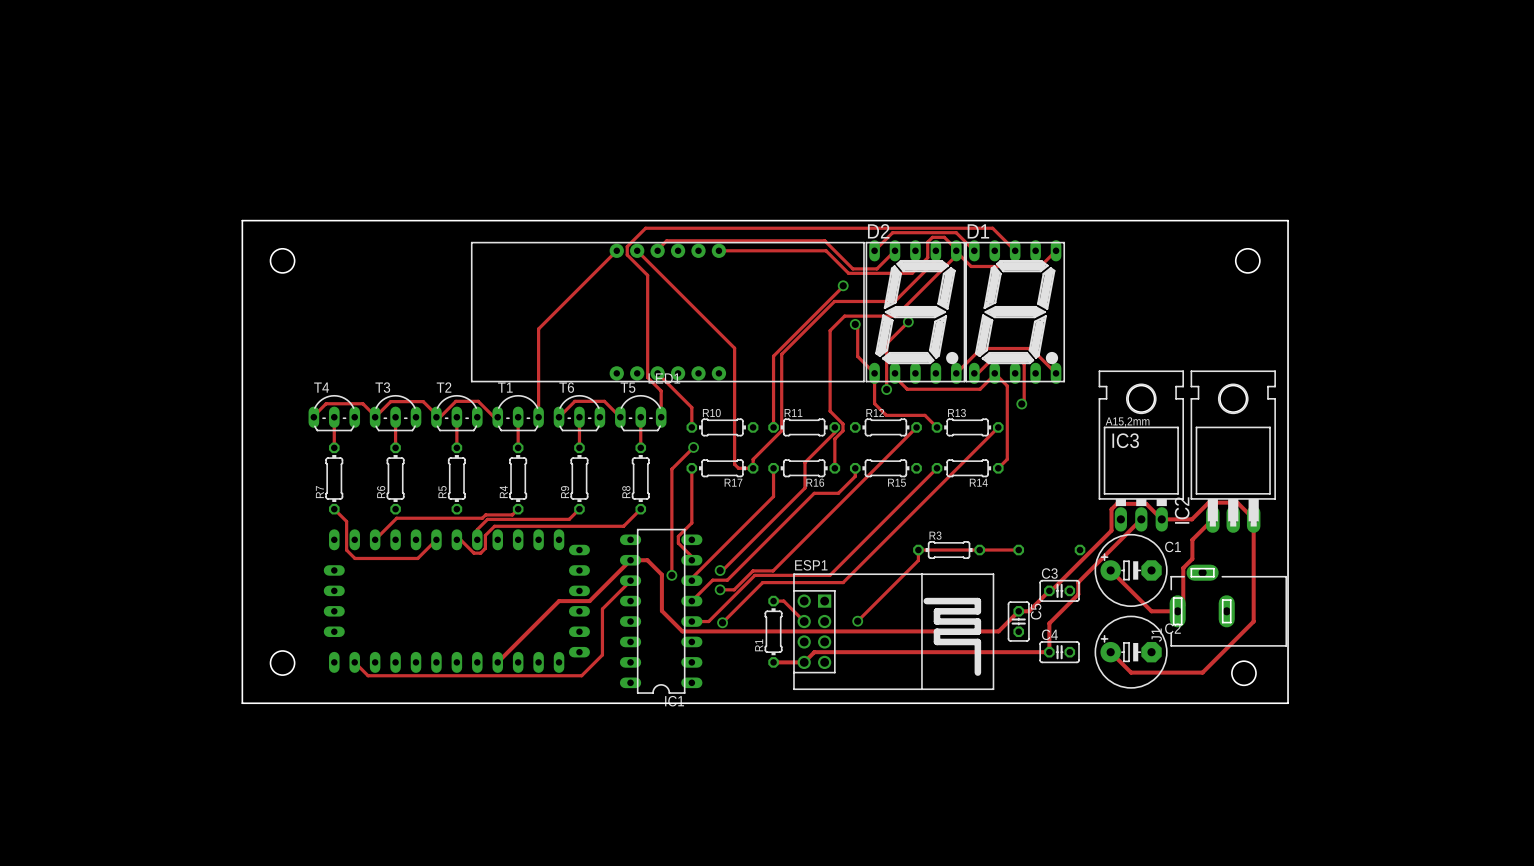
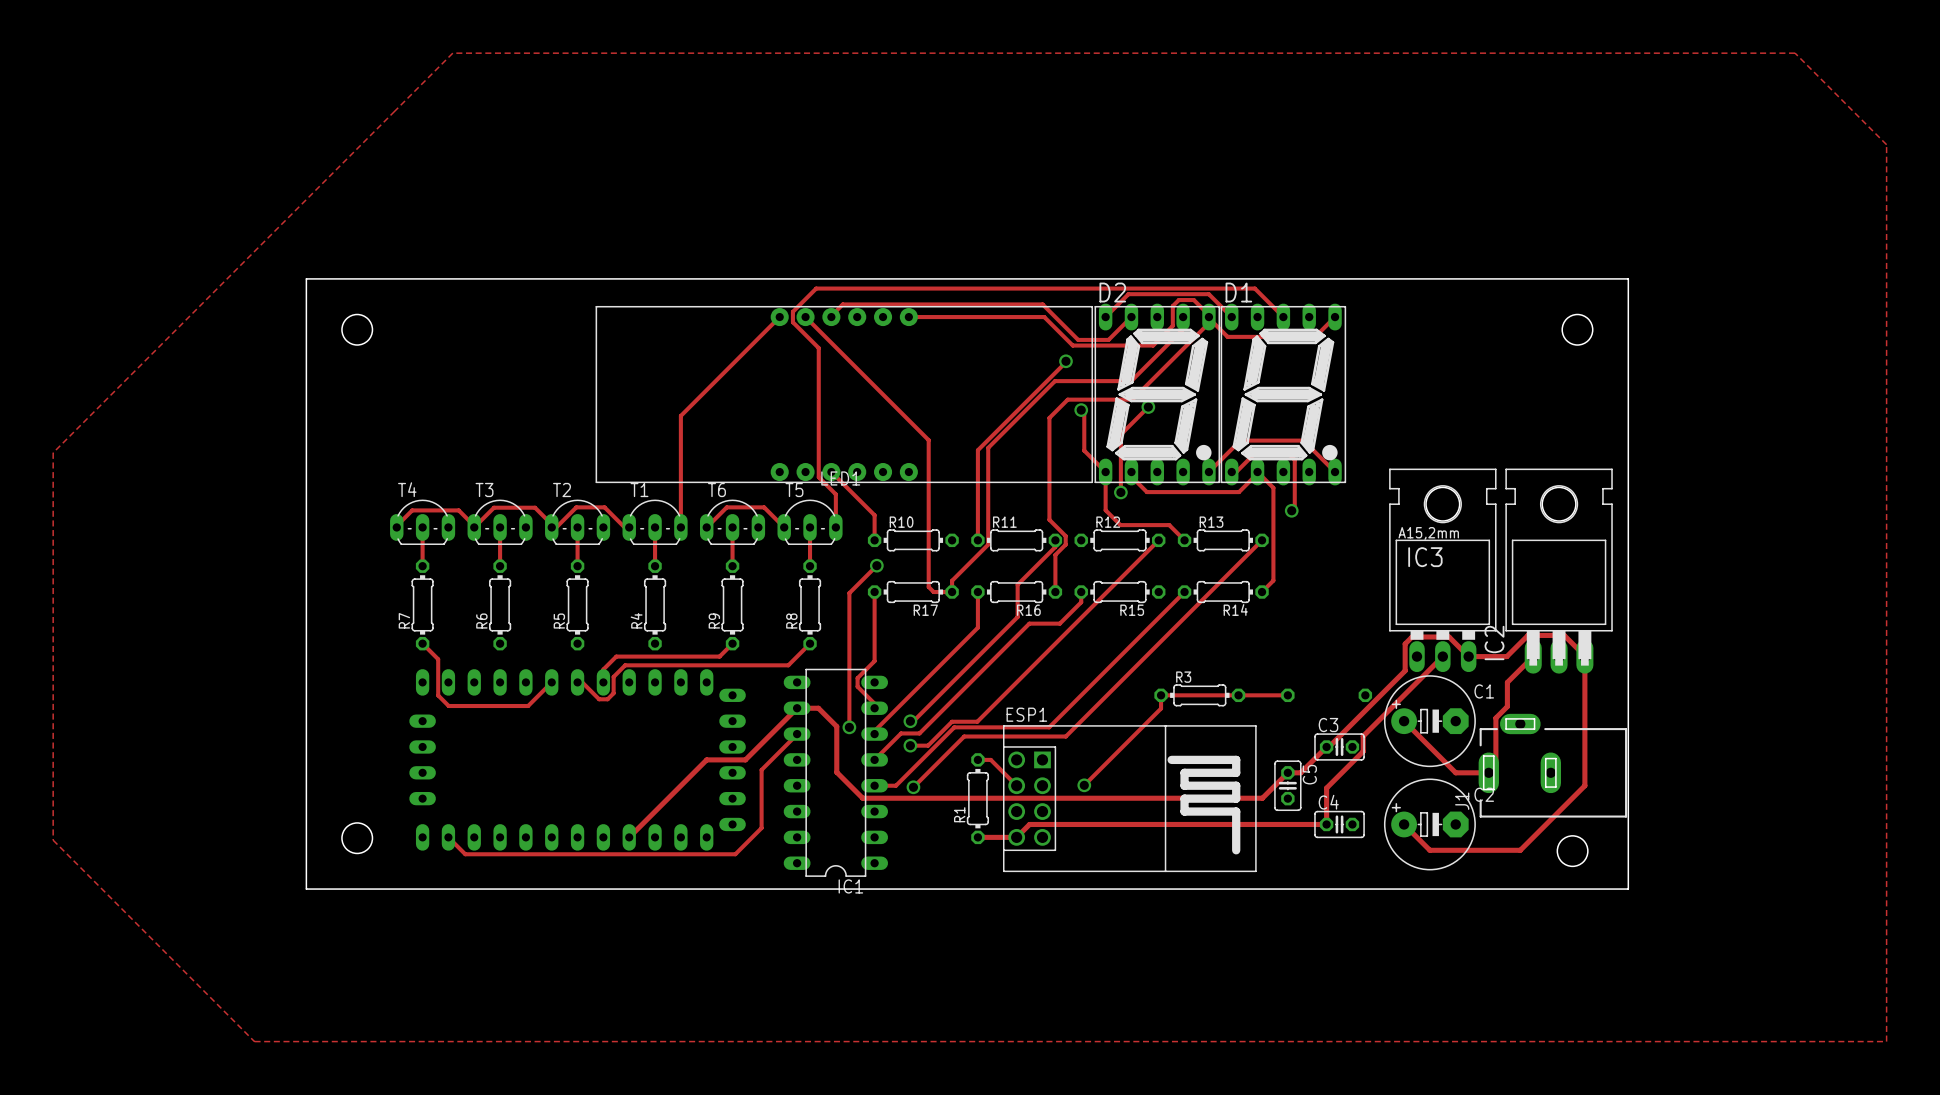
zone outline: none -> (452, 53) (53, 452) (53, 840) (254, 1041) (1886, 1041) (1886, 144) (1795, 53) (452, 53)
track: (518, 509) (512, 514) (485, 514) (482, 518) (396, 518) (375, 539) -> none

